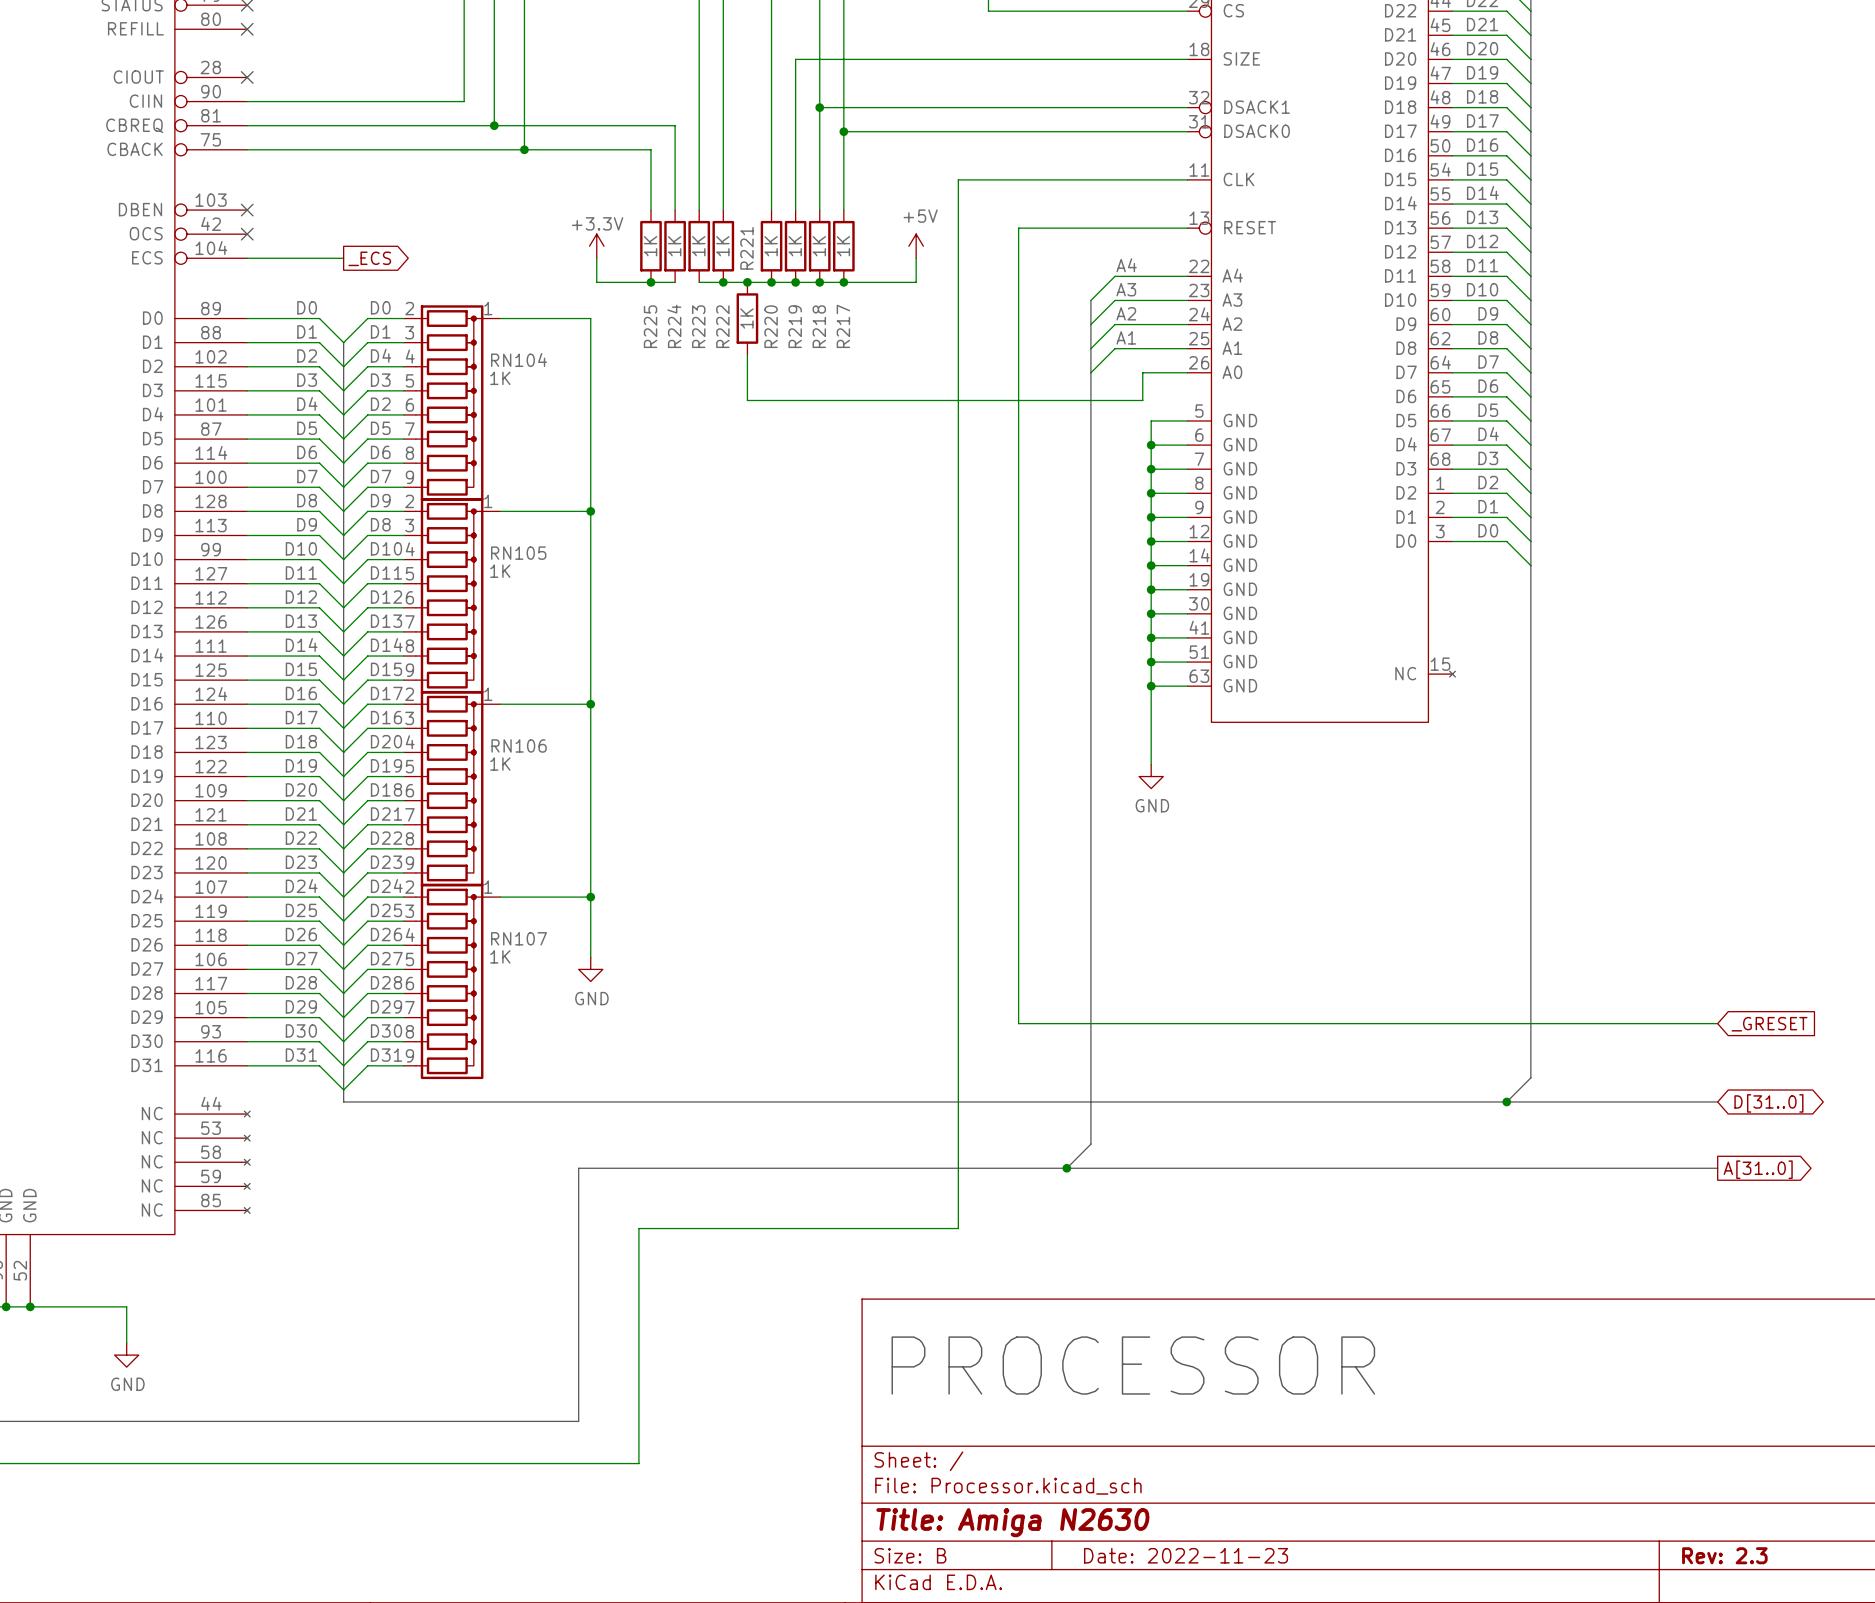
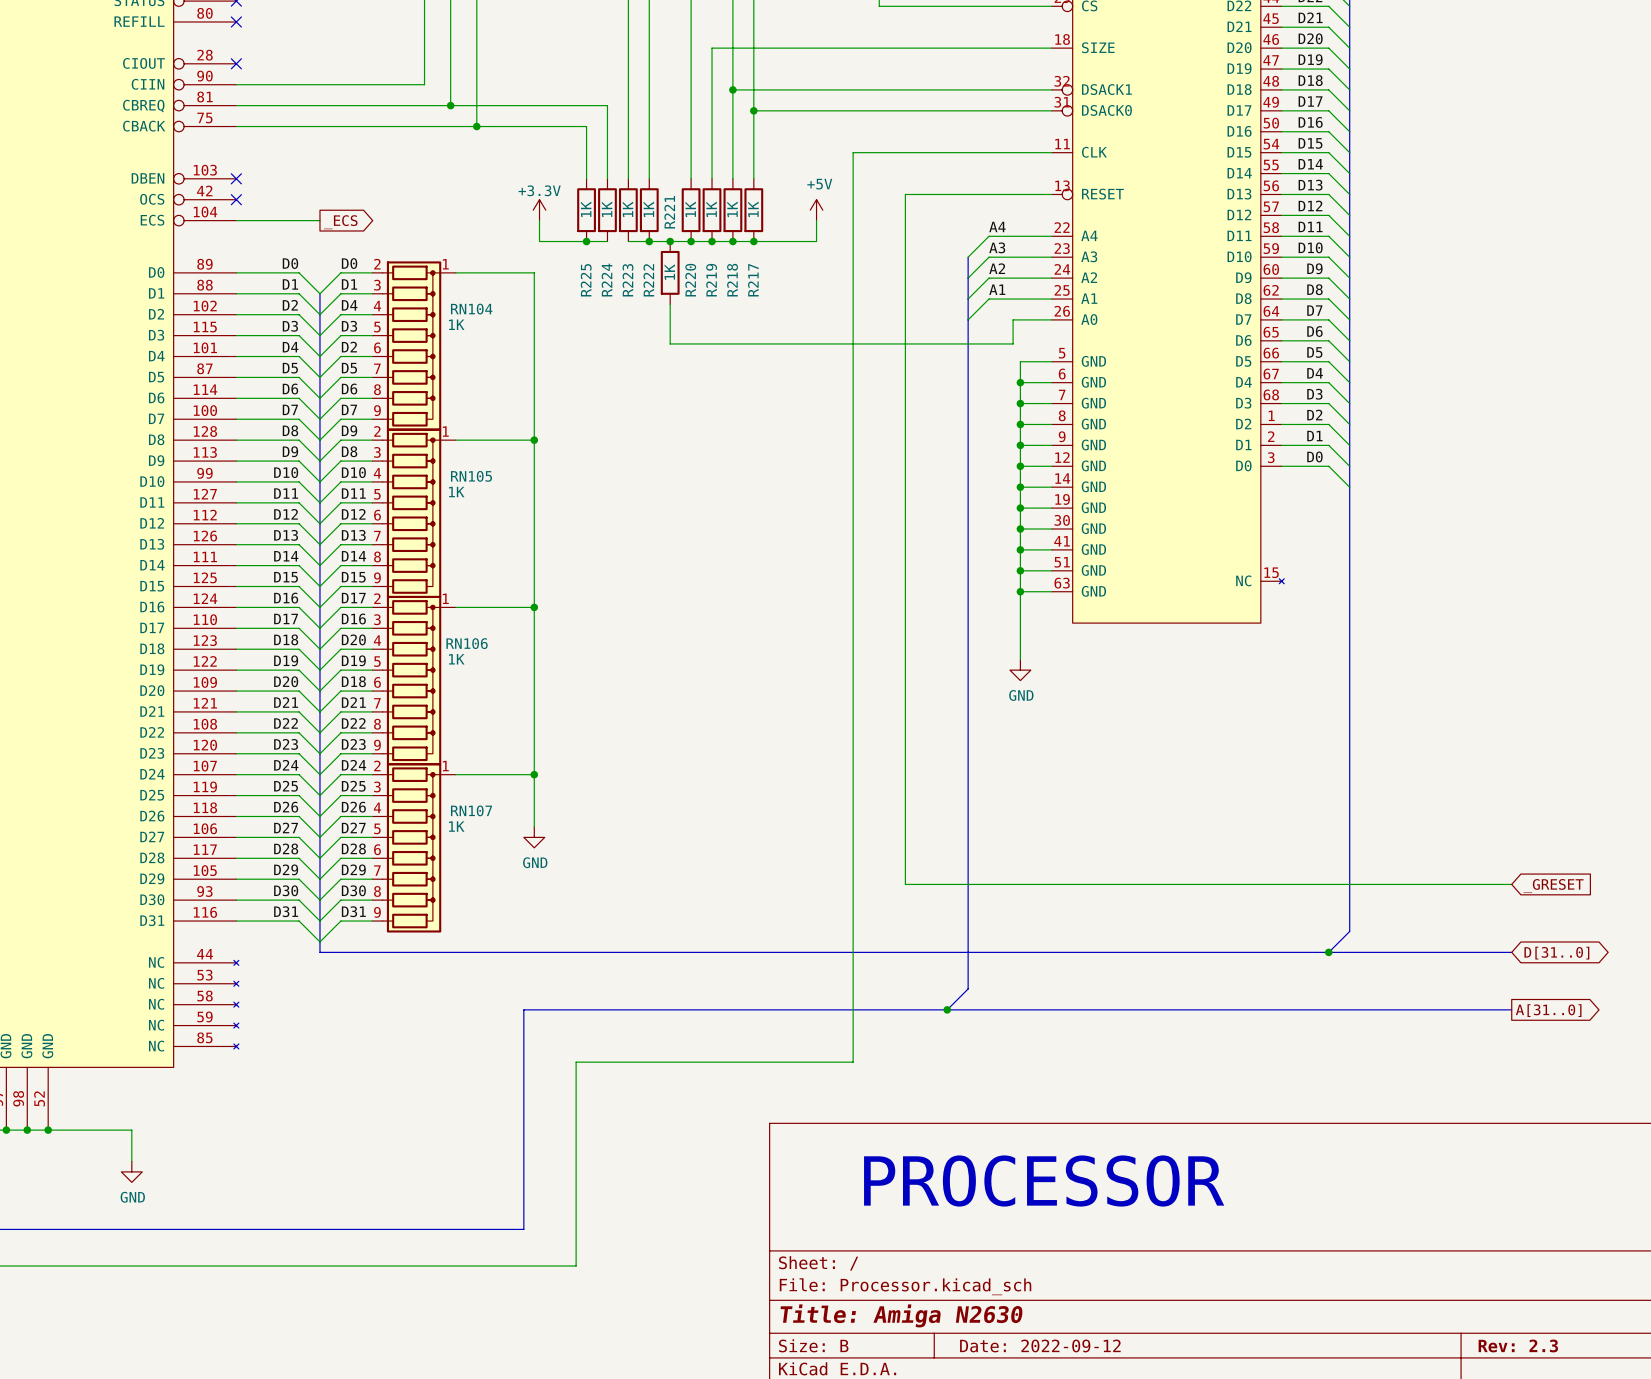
title block: Date: 2022-11-23 (1186, 1555) -> Date: 2022-09-12 (1040, 1345)

